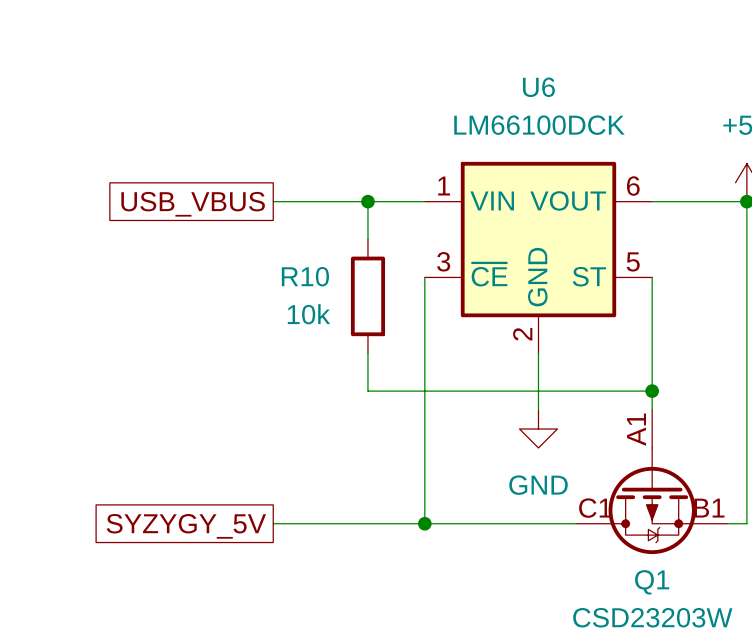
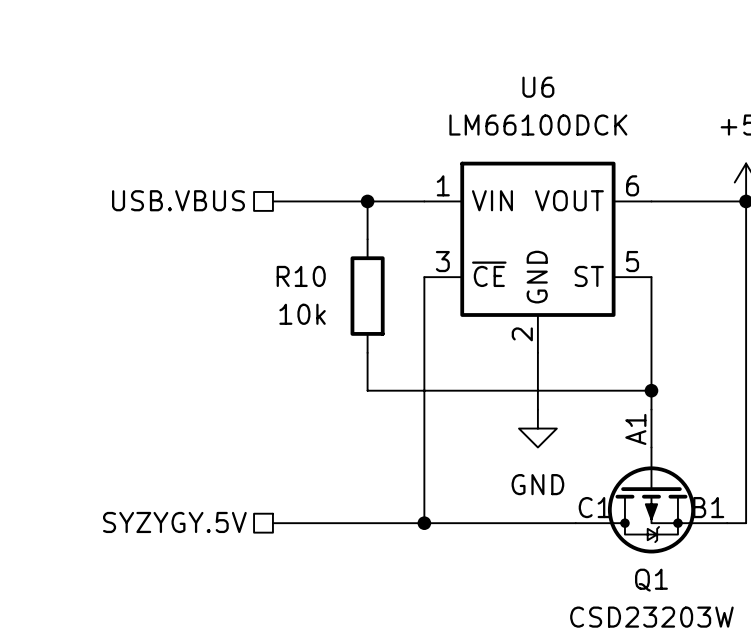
hierarchical label: none -> USB.VBUS (178, 200)
global label: USB_VBUS (193, 204) -> none
hierarchical label: none -> SYZYGY.5V (174, 522)
global label: SYZYGY_5V (186, 526) -> none

